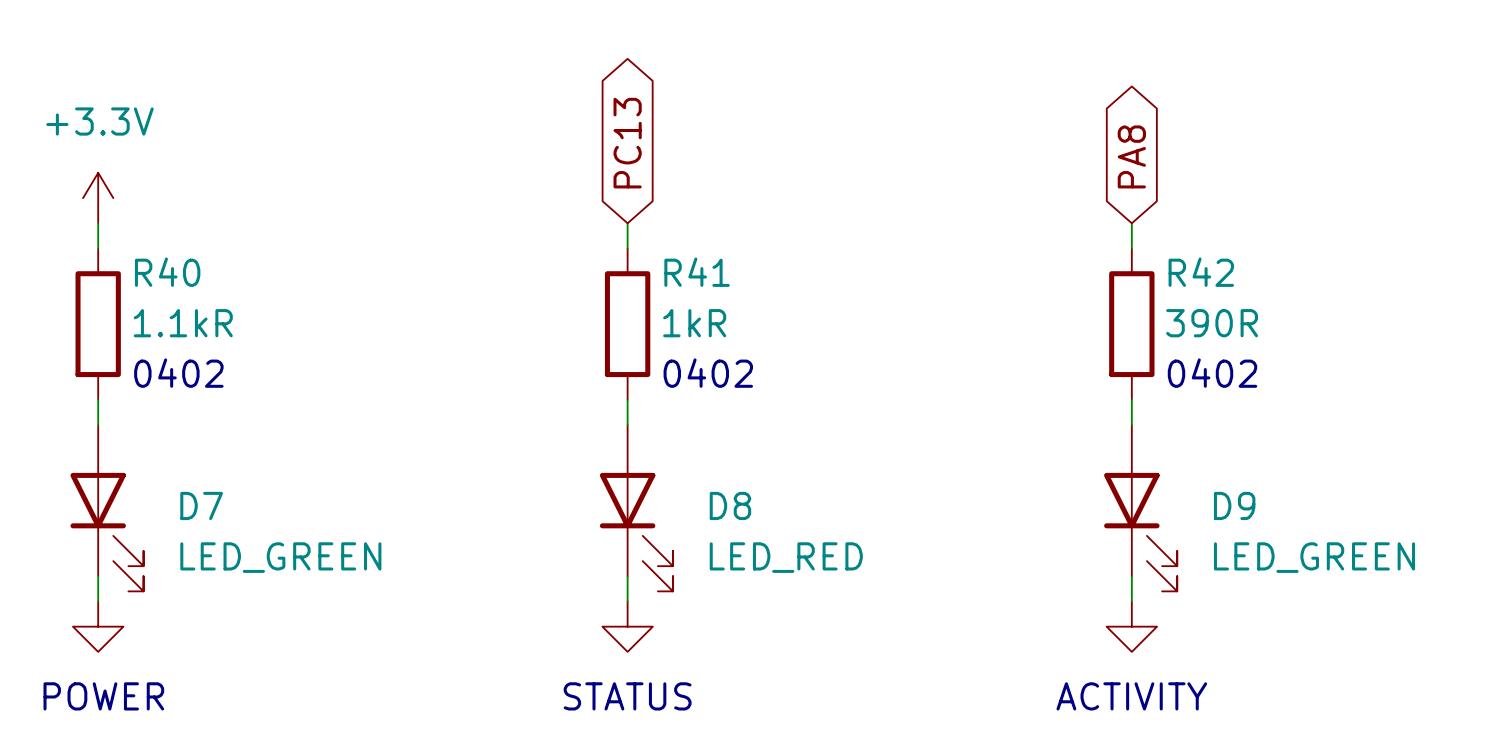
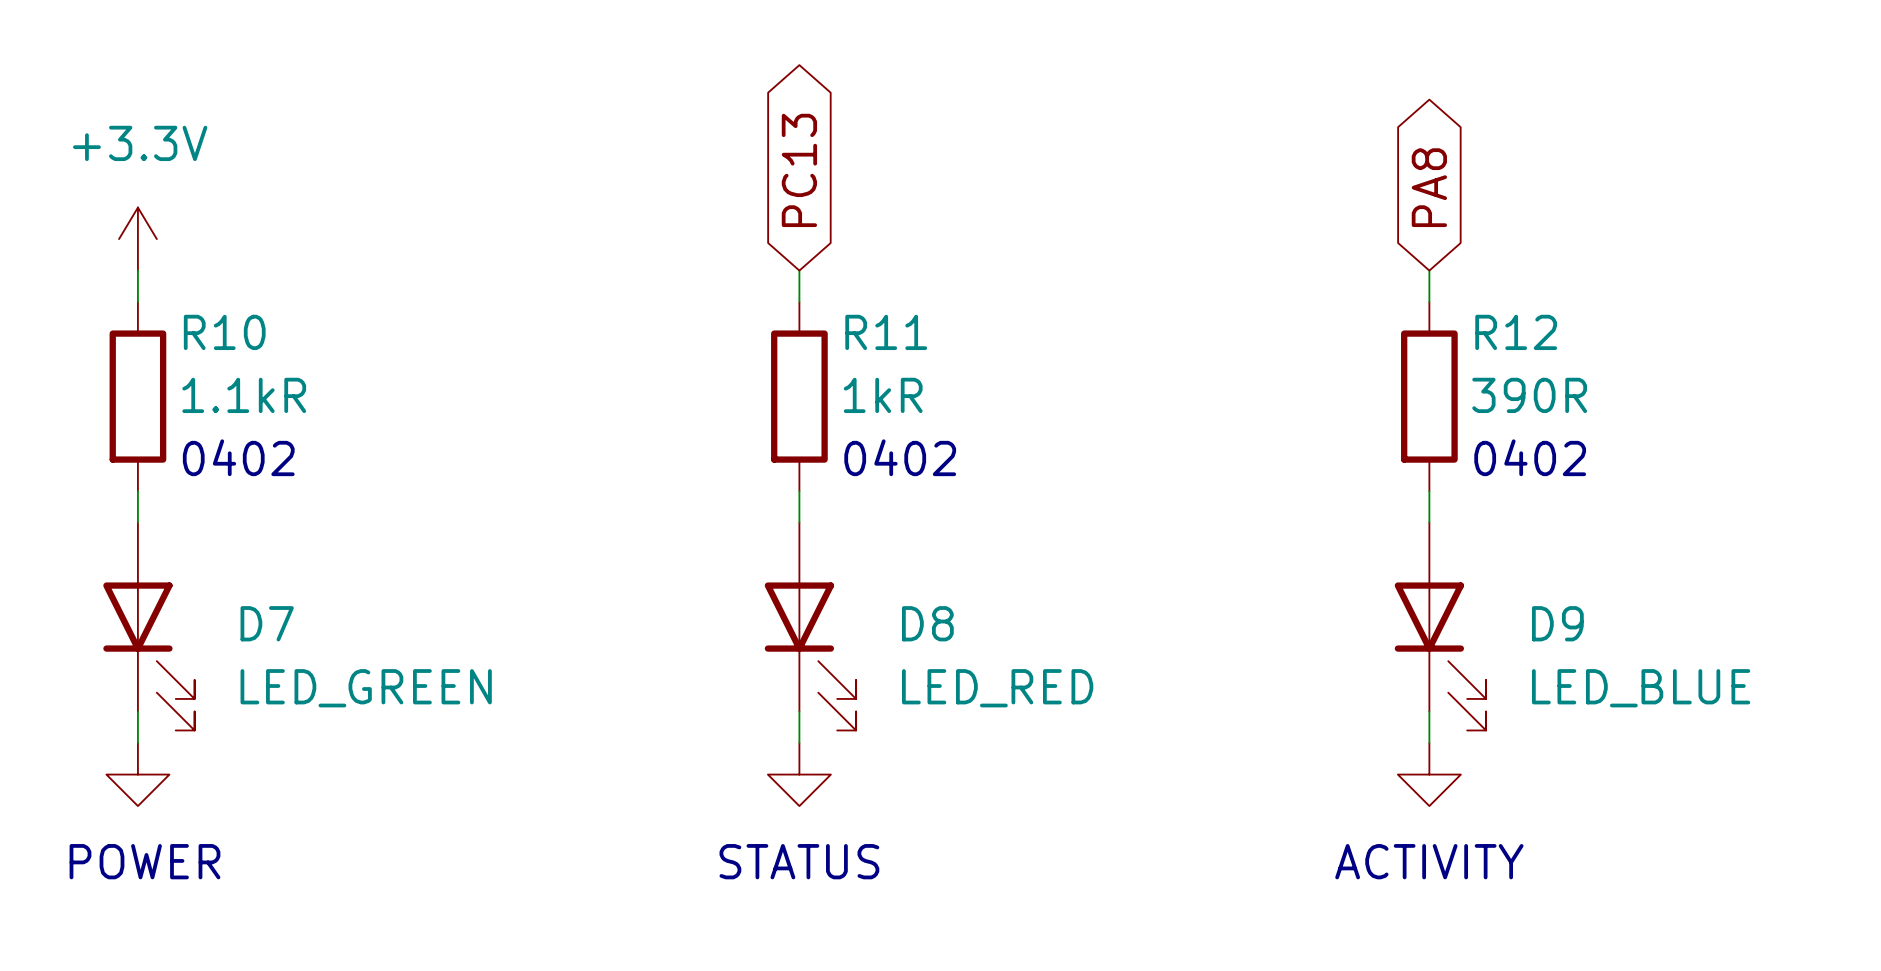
R40 name: R40 (167, 272) -> R10 (224, 332)
R41 name: R41 (697, 272) -> R11 (886, 332)
R42 name: R42 (1201, 272) -> R12 (1516, 332)
D9 value: LED_GREEN (1314, 557) -> LED_BLUE (1641, 688)

